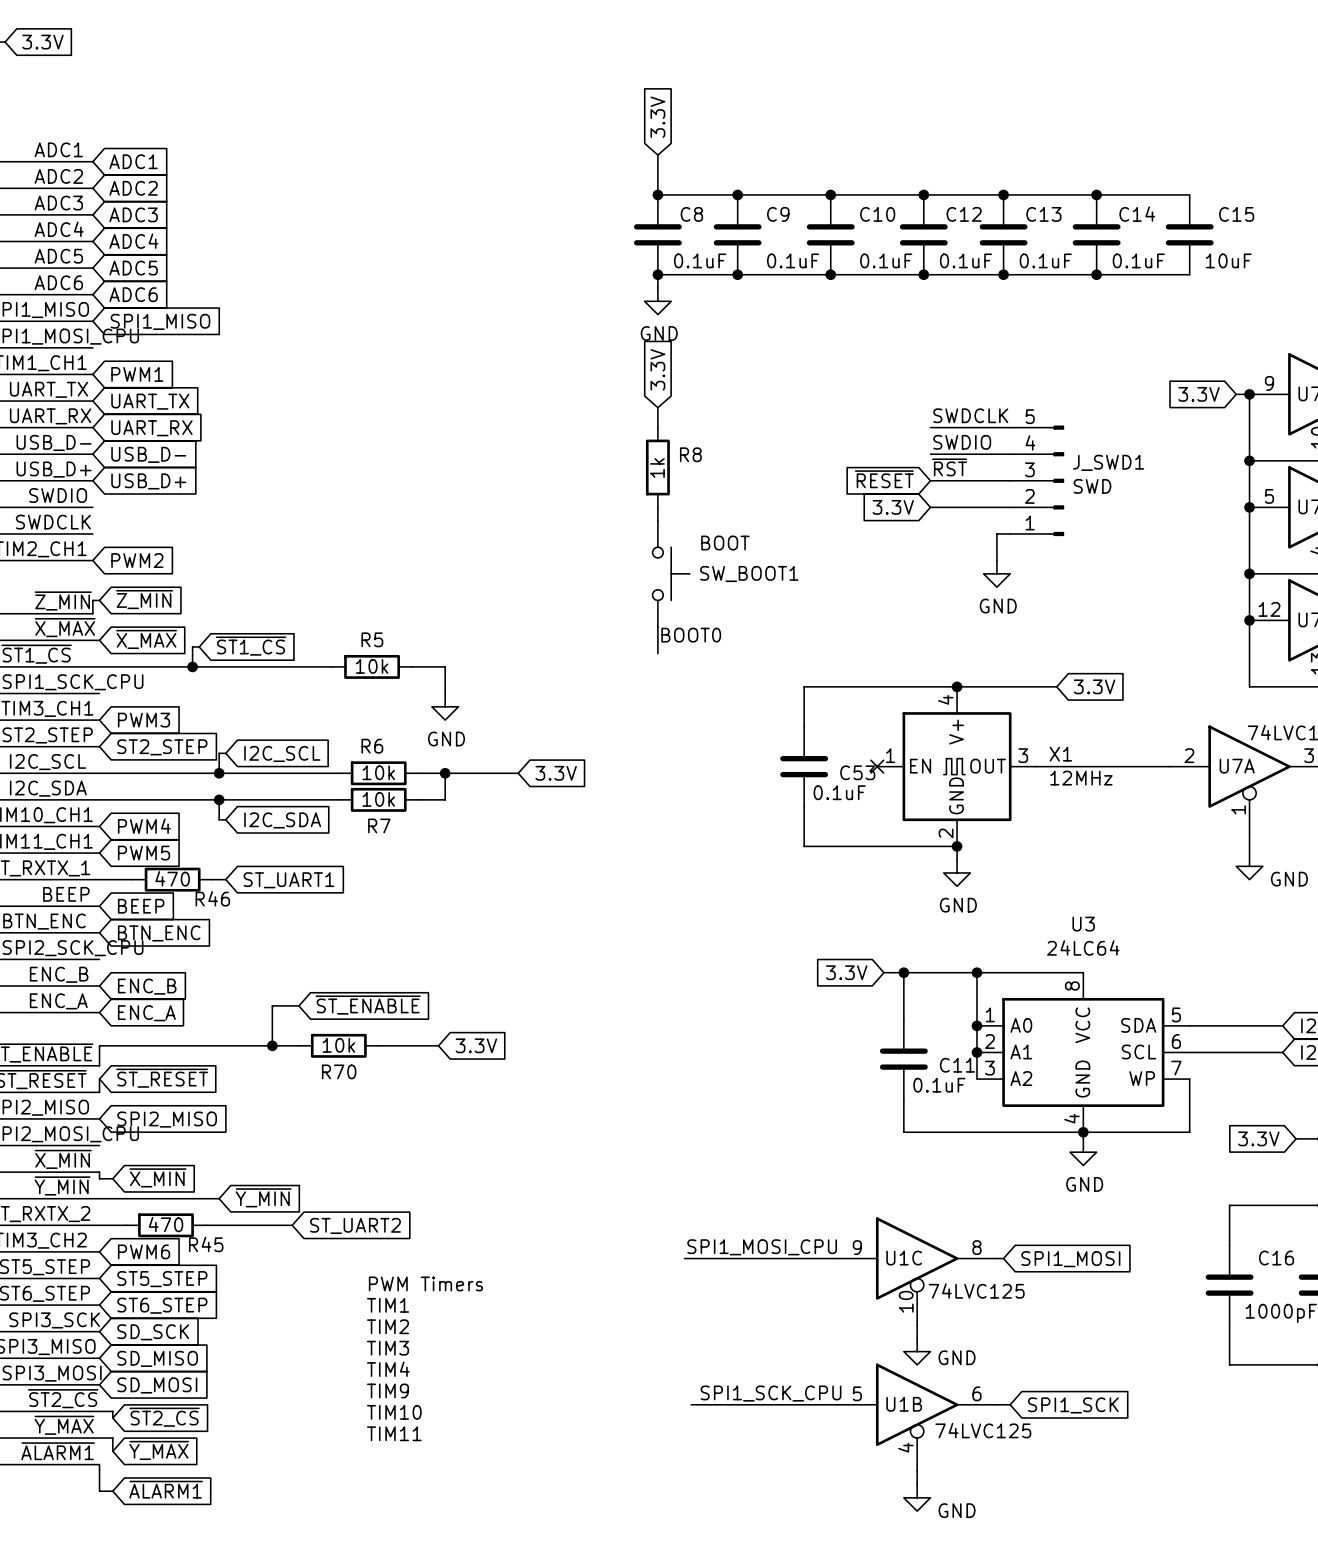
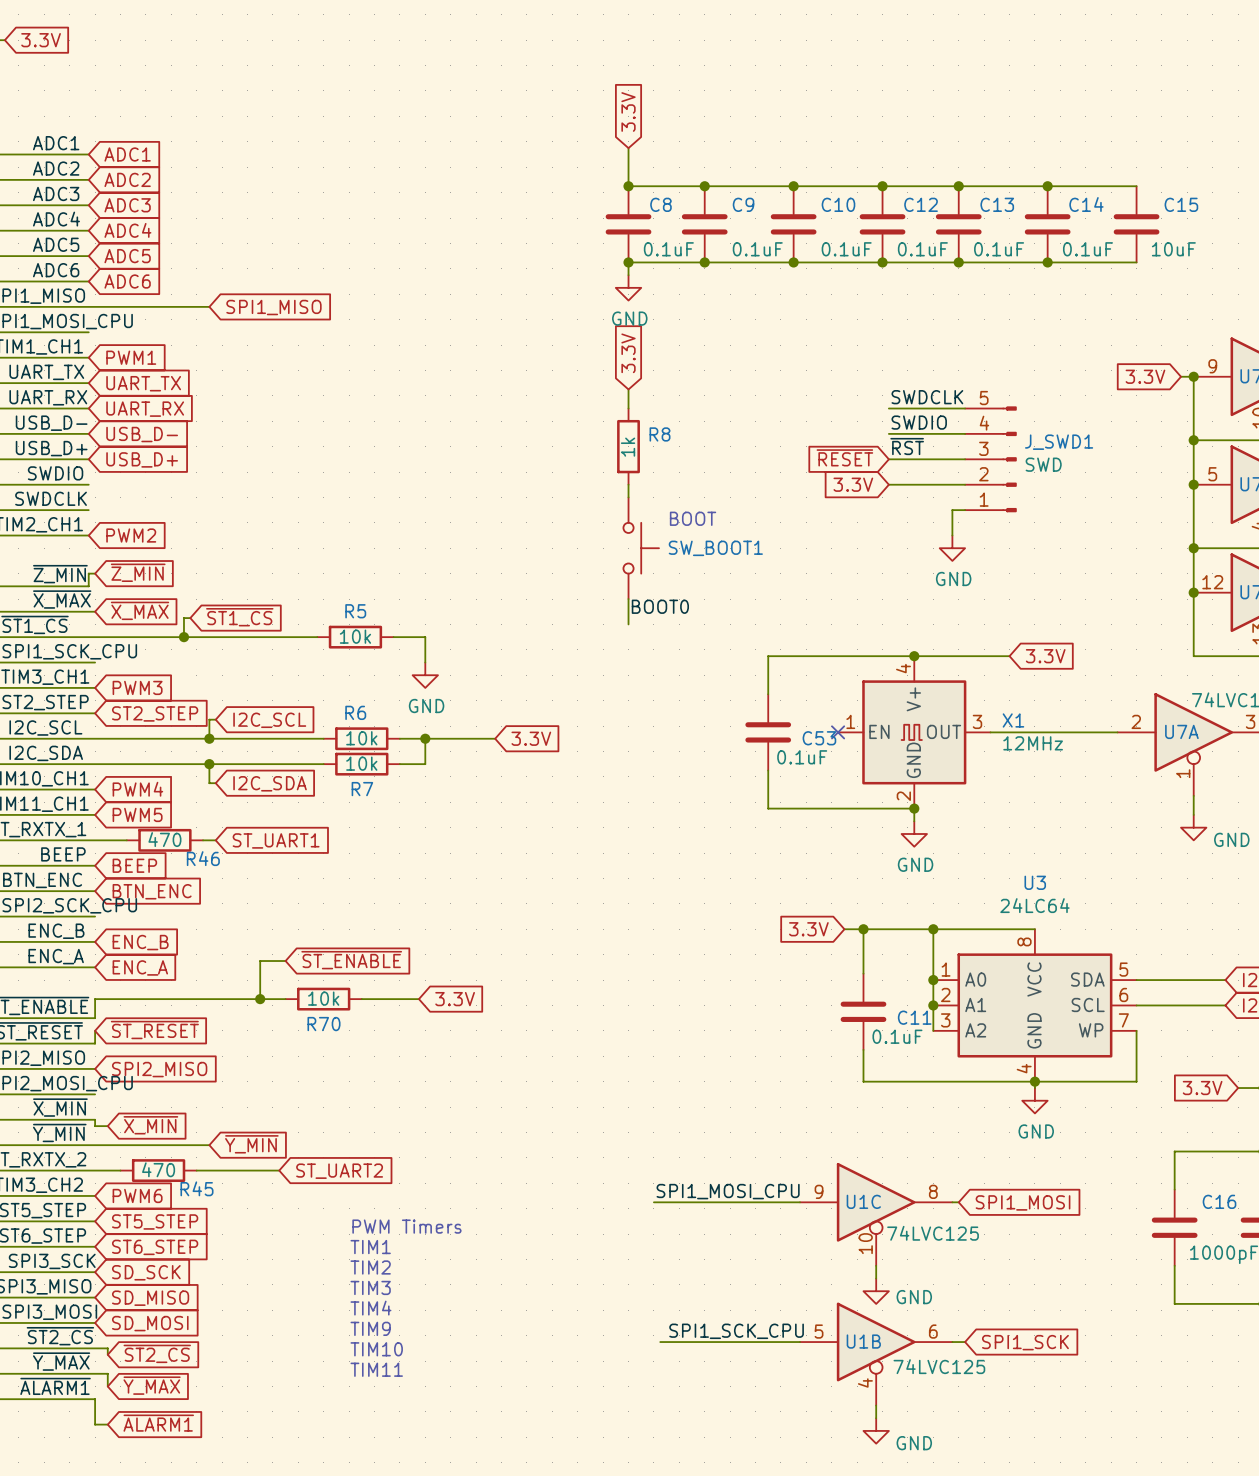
wire: none -> (88, 306) (209, 306)
global label position: SPI1_MISO (160, 321) -> SPI1_MISO (273, 307)

